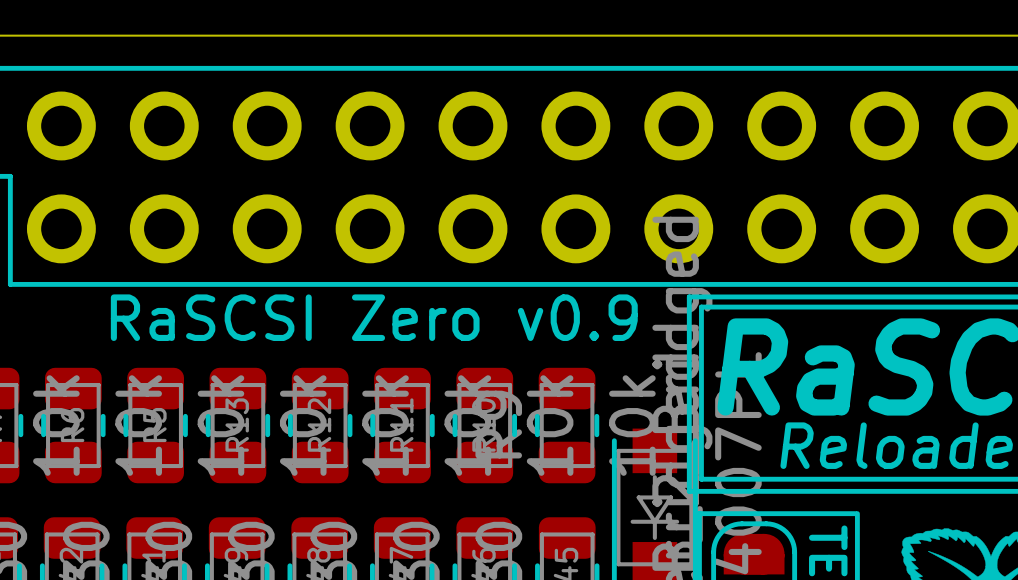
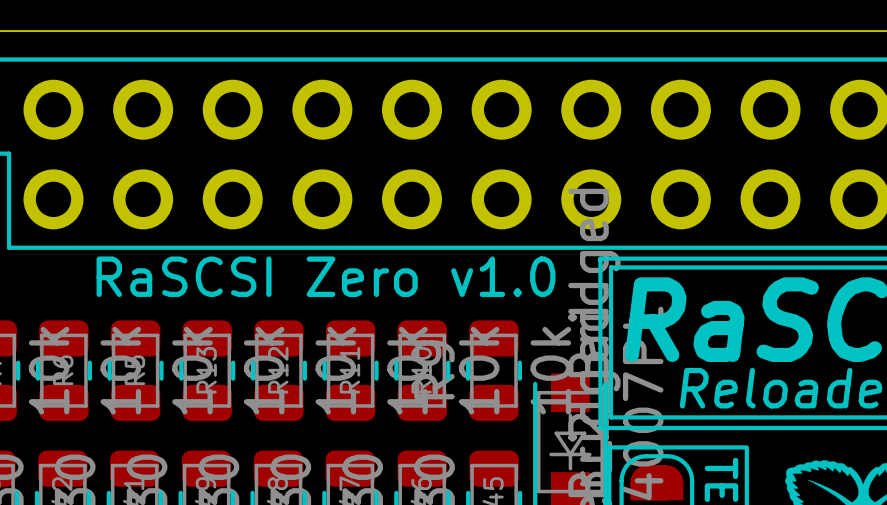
text: RaSCSI Zero v0.9 (374, 317) -> RaSCSI Zero v1.0 (326, 276)

